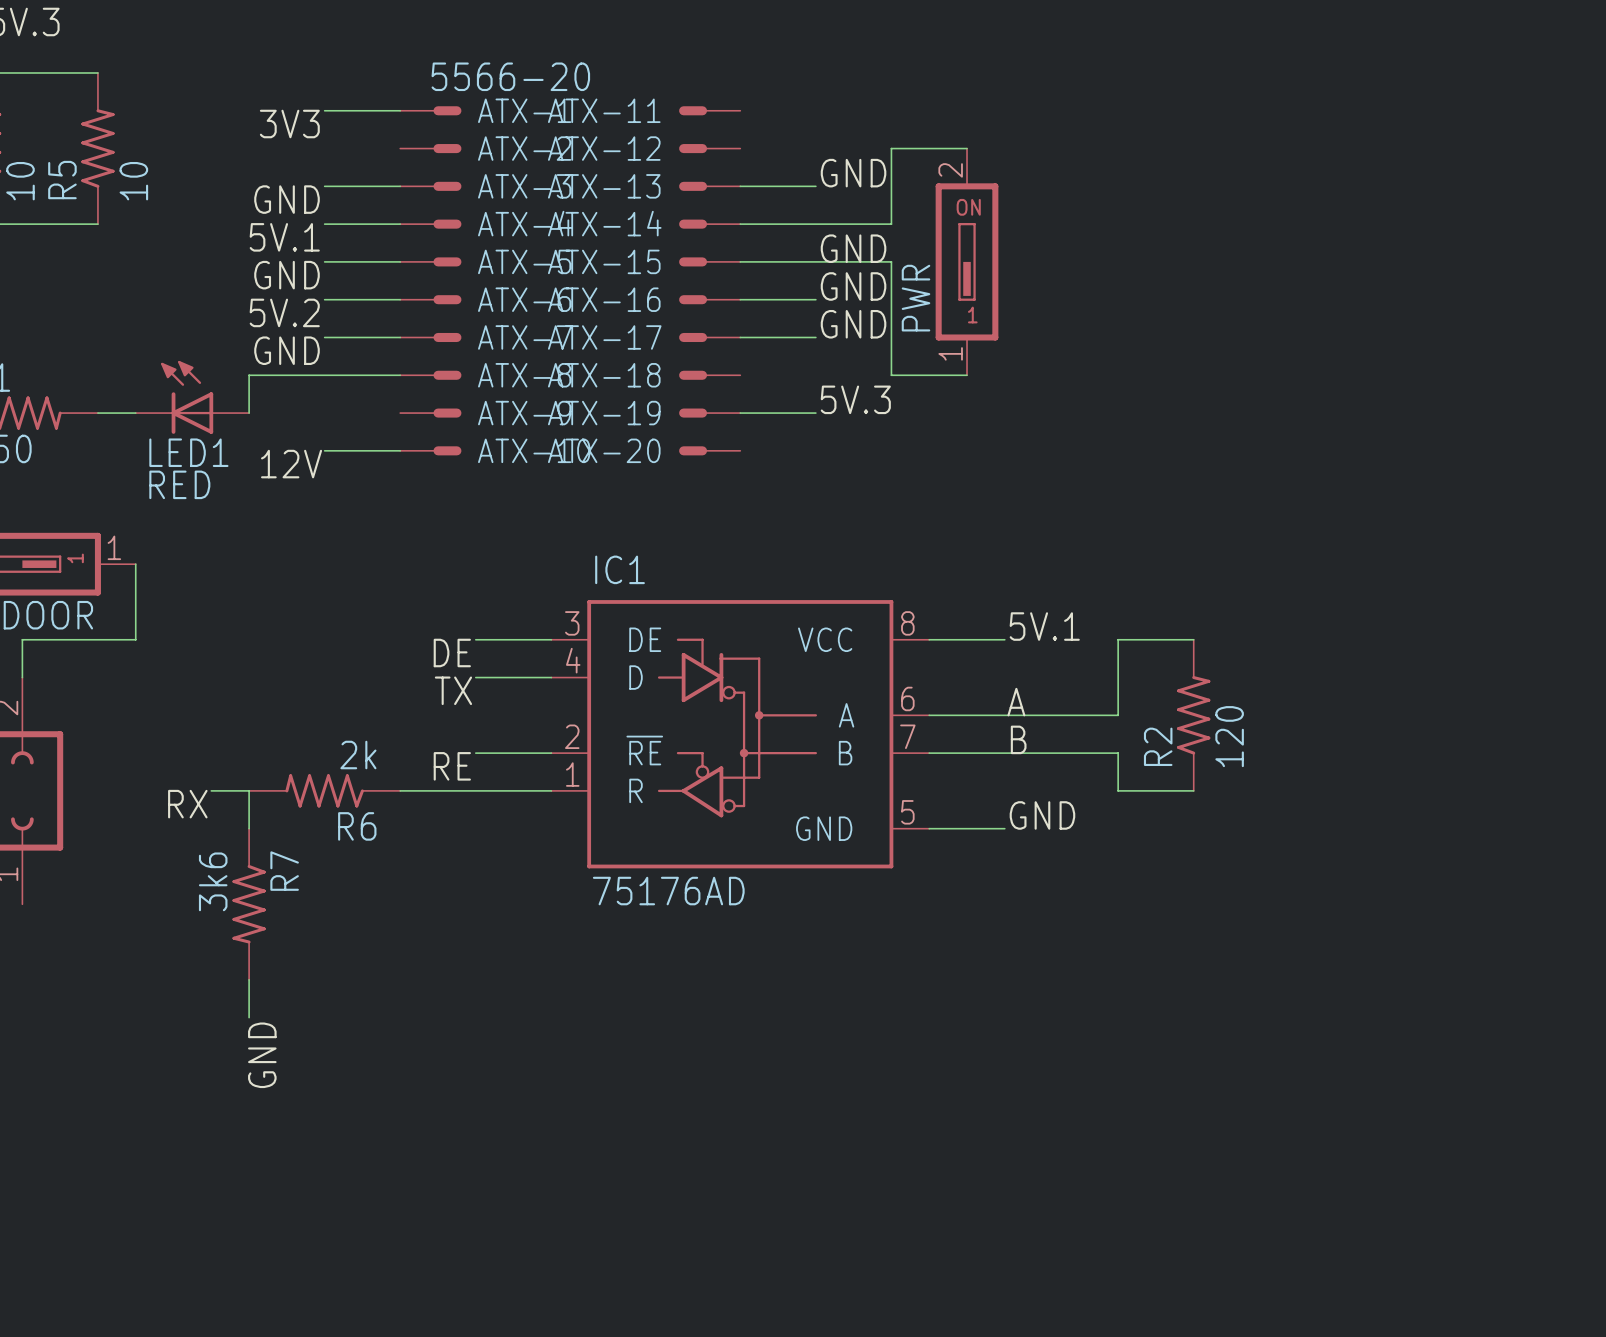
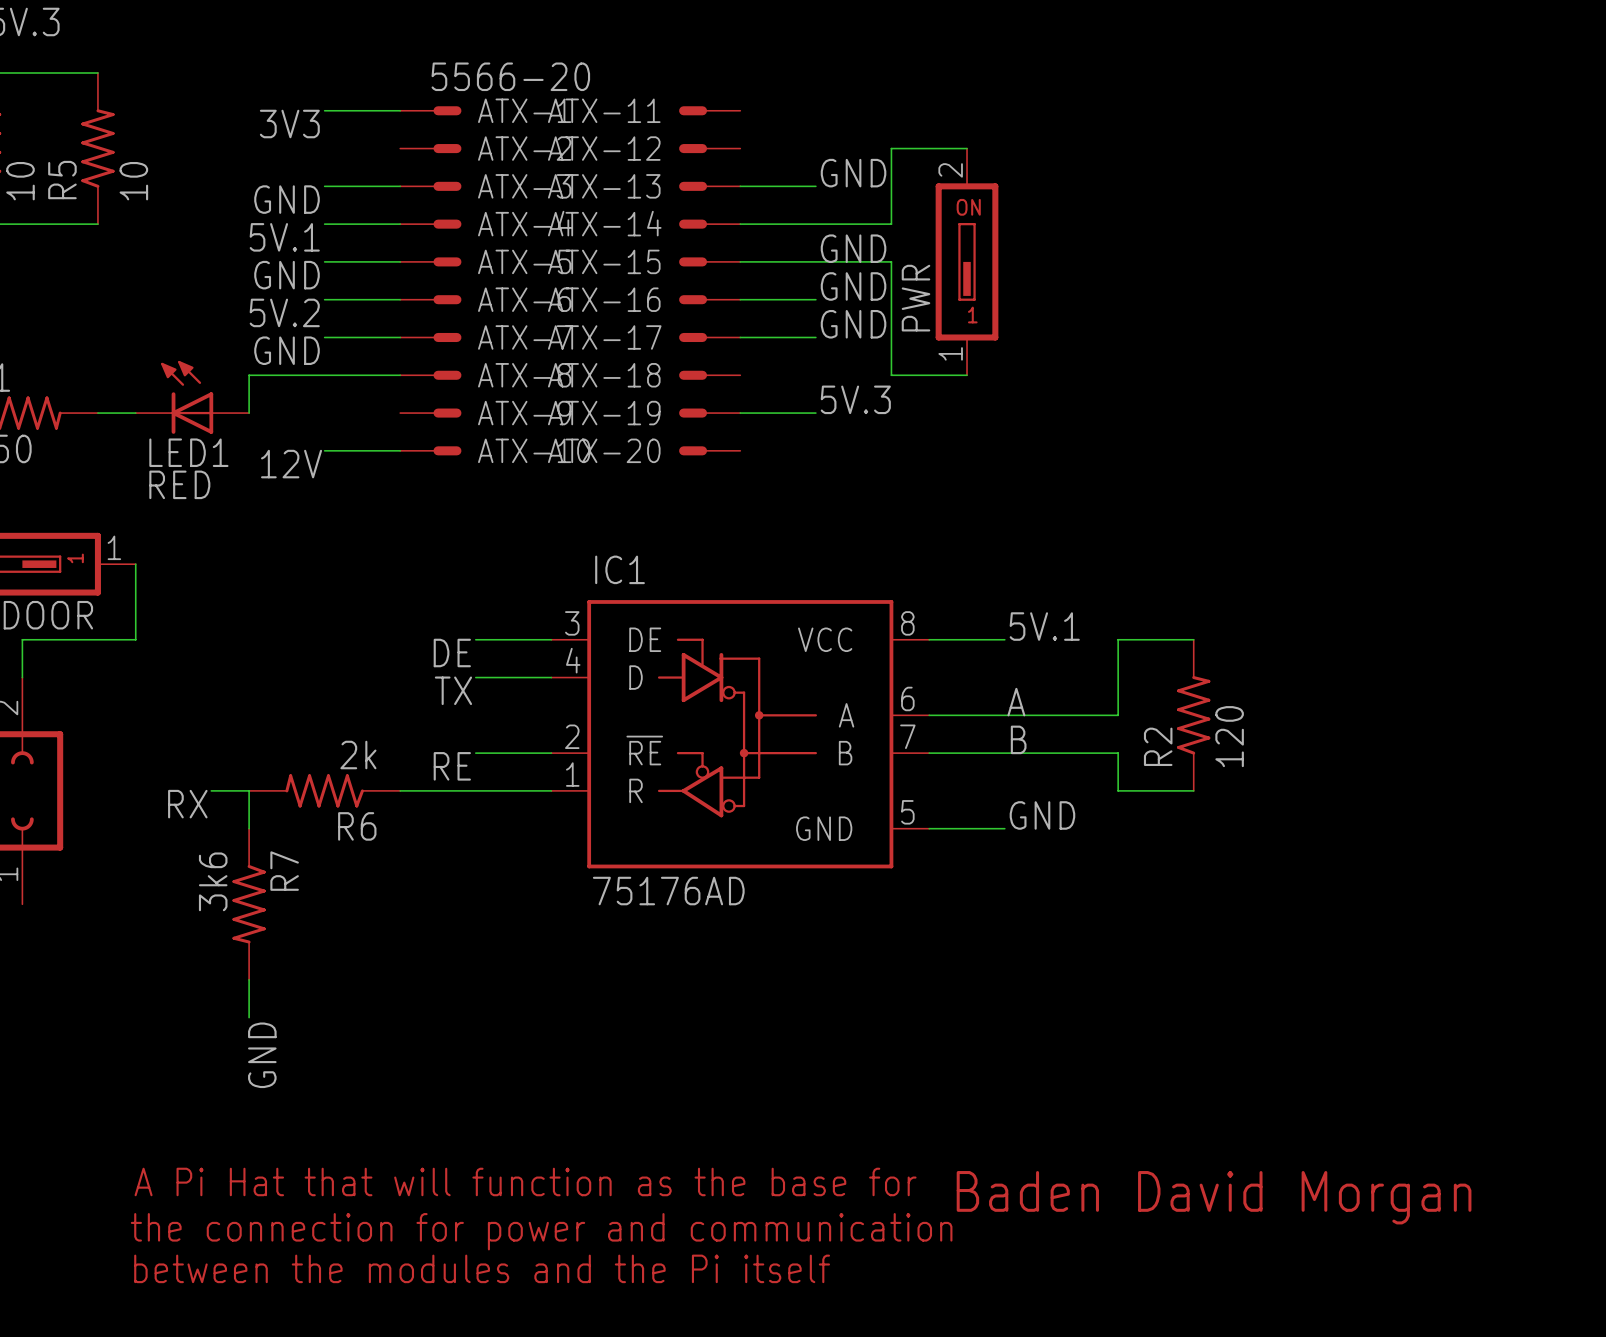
text: none -> A Pi Hat that will function as the base for (525, 1181)
text: none -> Baden David Morgan (1214, 1197)
text: none -> the connection for power and communication (541, 1231)
text: none -> between the modules and the Pi itself (482, 1268)

